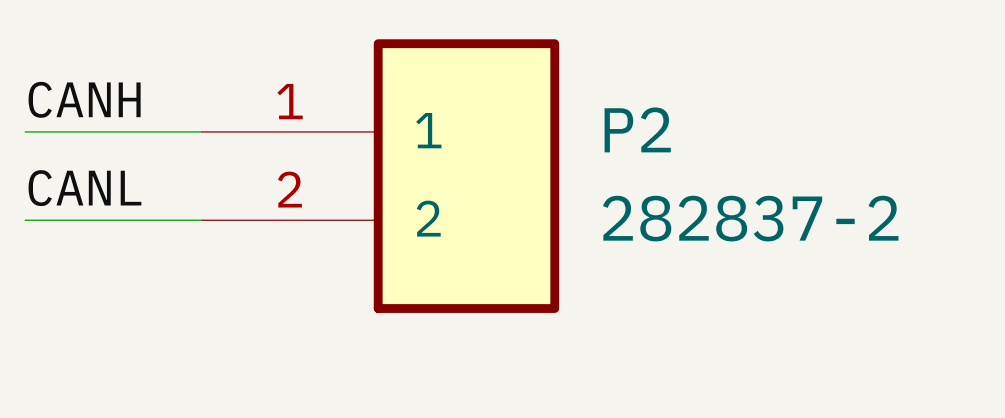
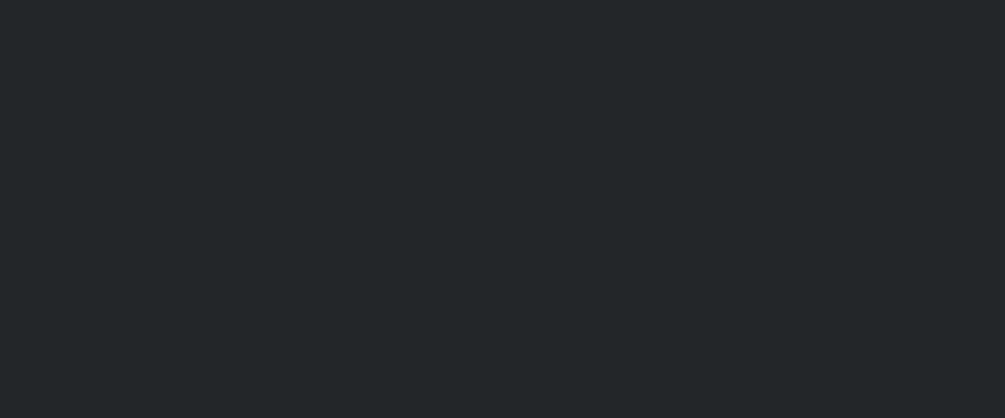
label: CANH (84, 99) -> none
wire: (25, 131) (201, 131) -> none
P2: 282837-2 (380, 176) -> none
label: CANL (84, 188) -> none
wire: (25, 220) (201, 220) -> none

